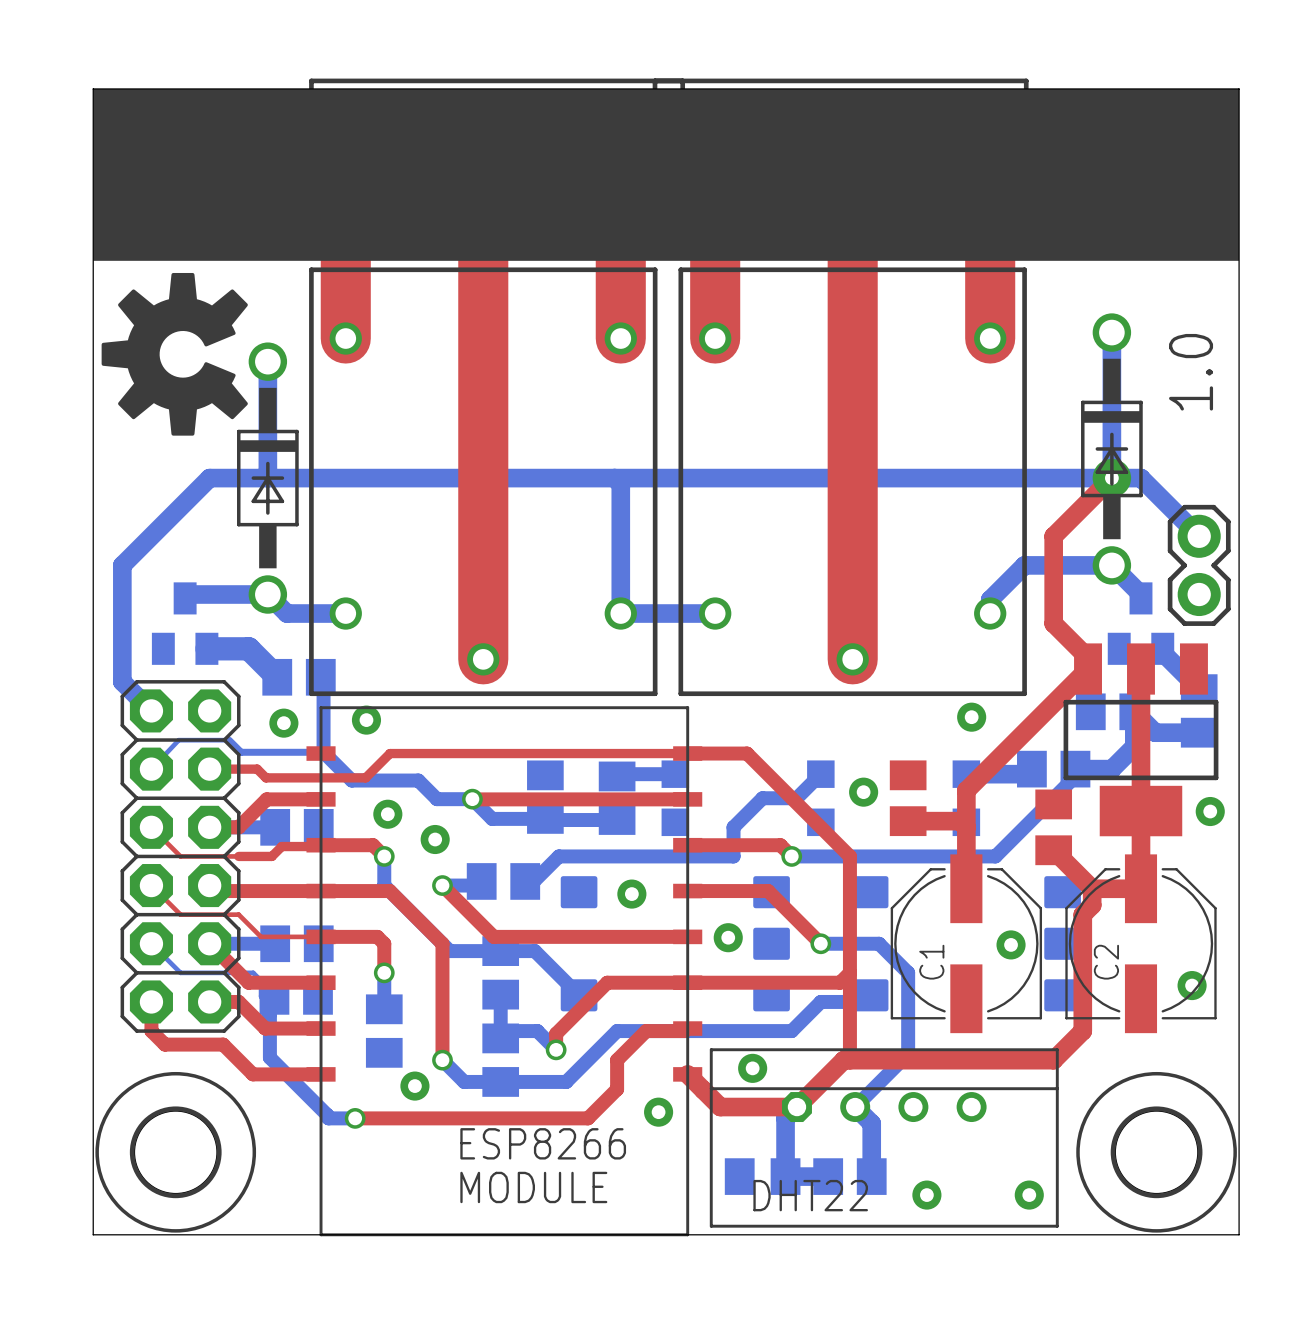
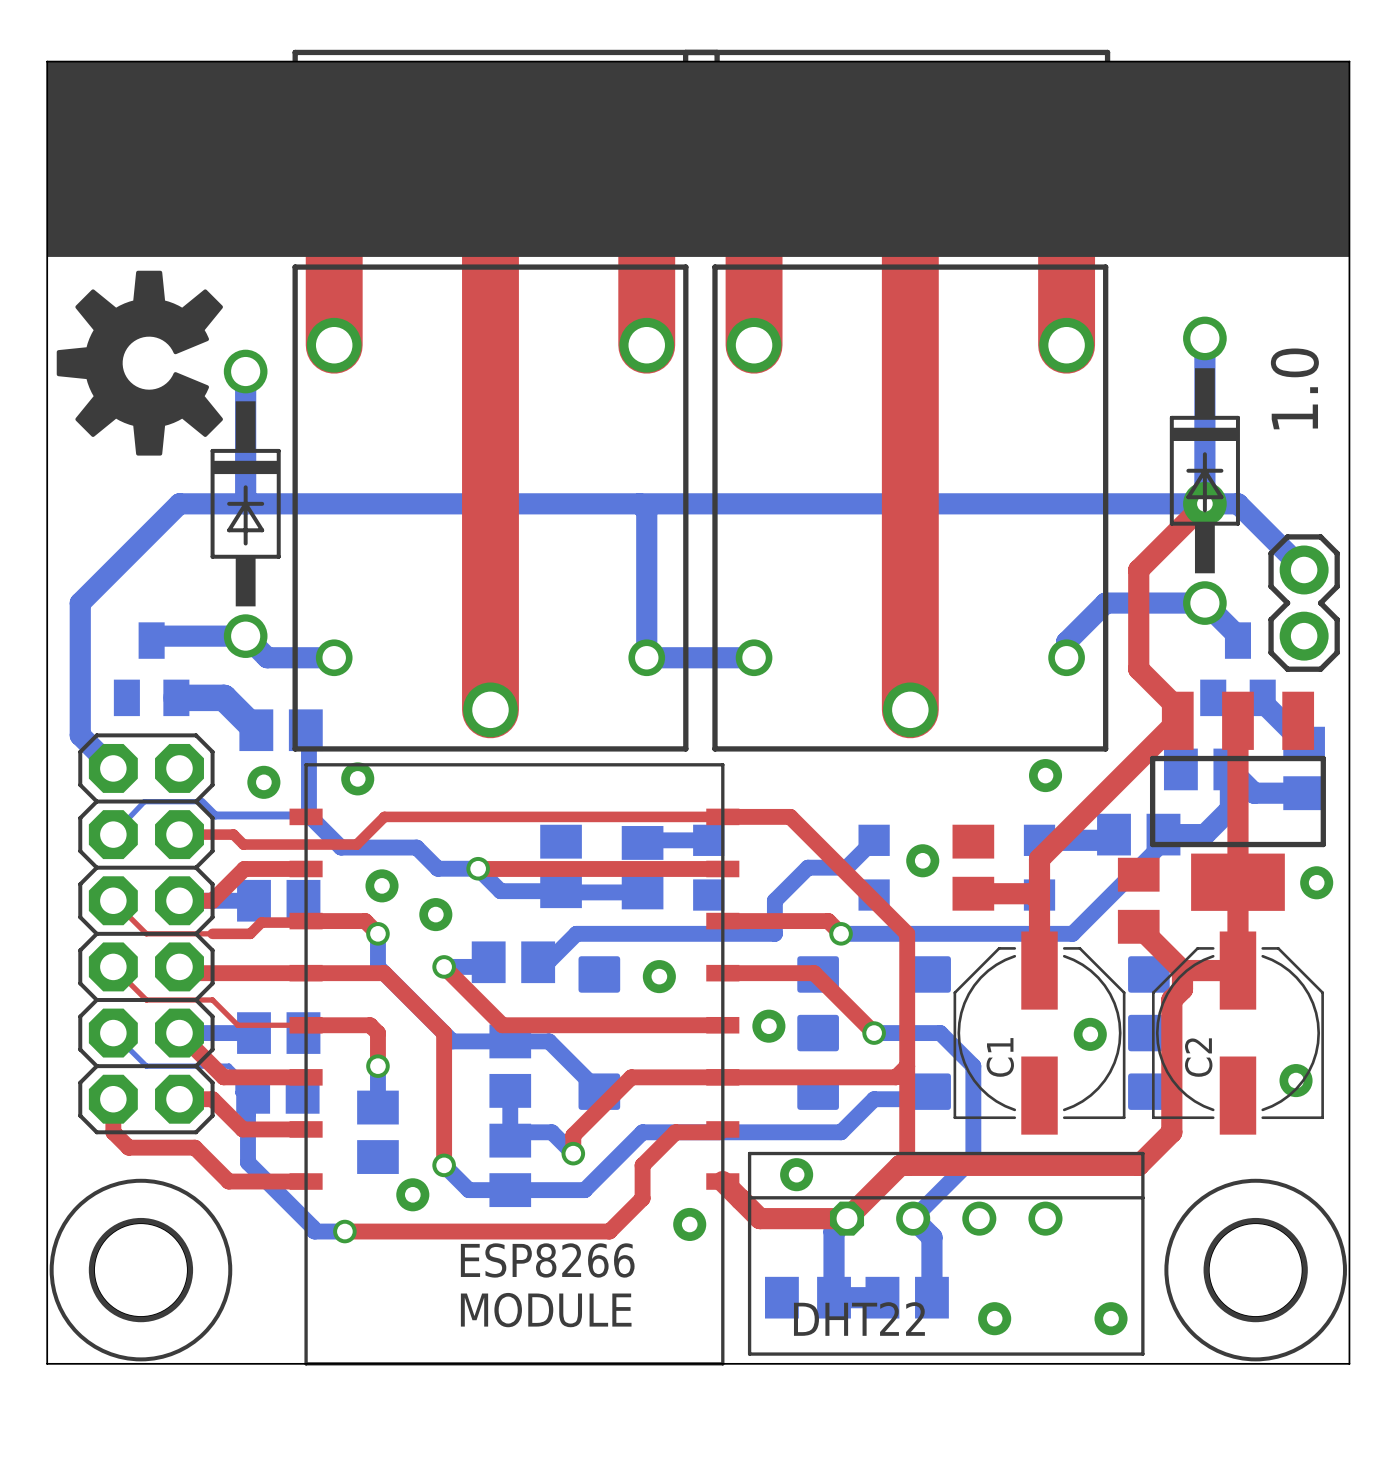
part footprint: [309, 267, 658, 697] -> [292, 264, 689, 752]
part footprint: [678, 267, 1027, 697] -> [712, 264, 1109, 752]

